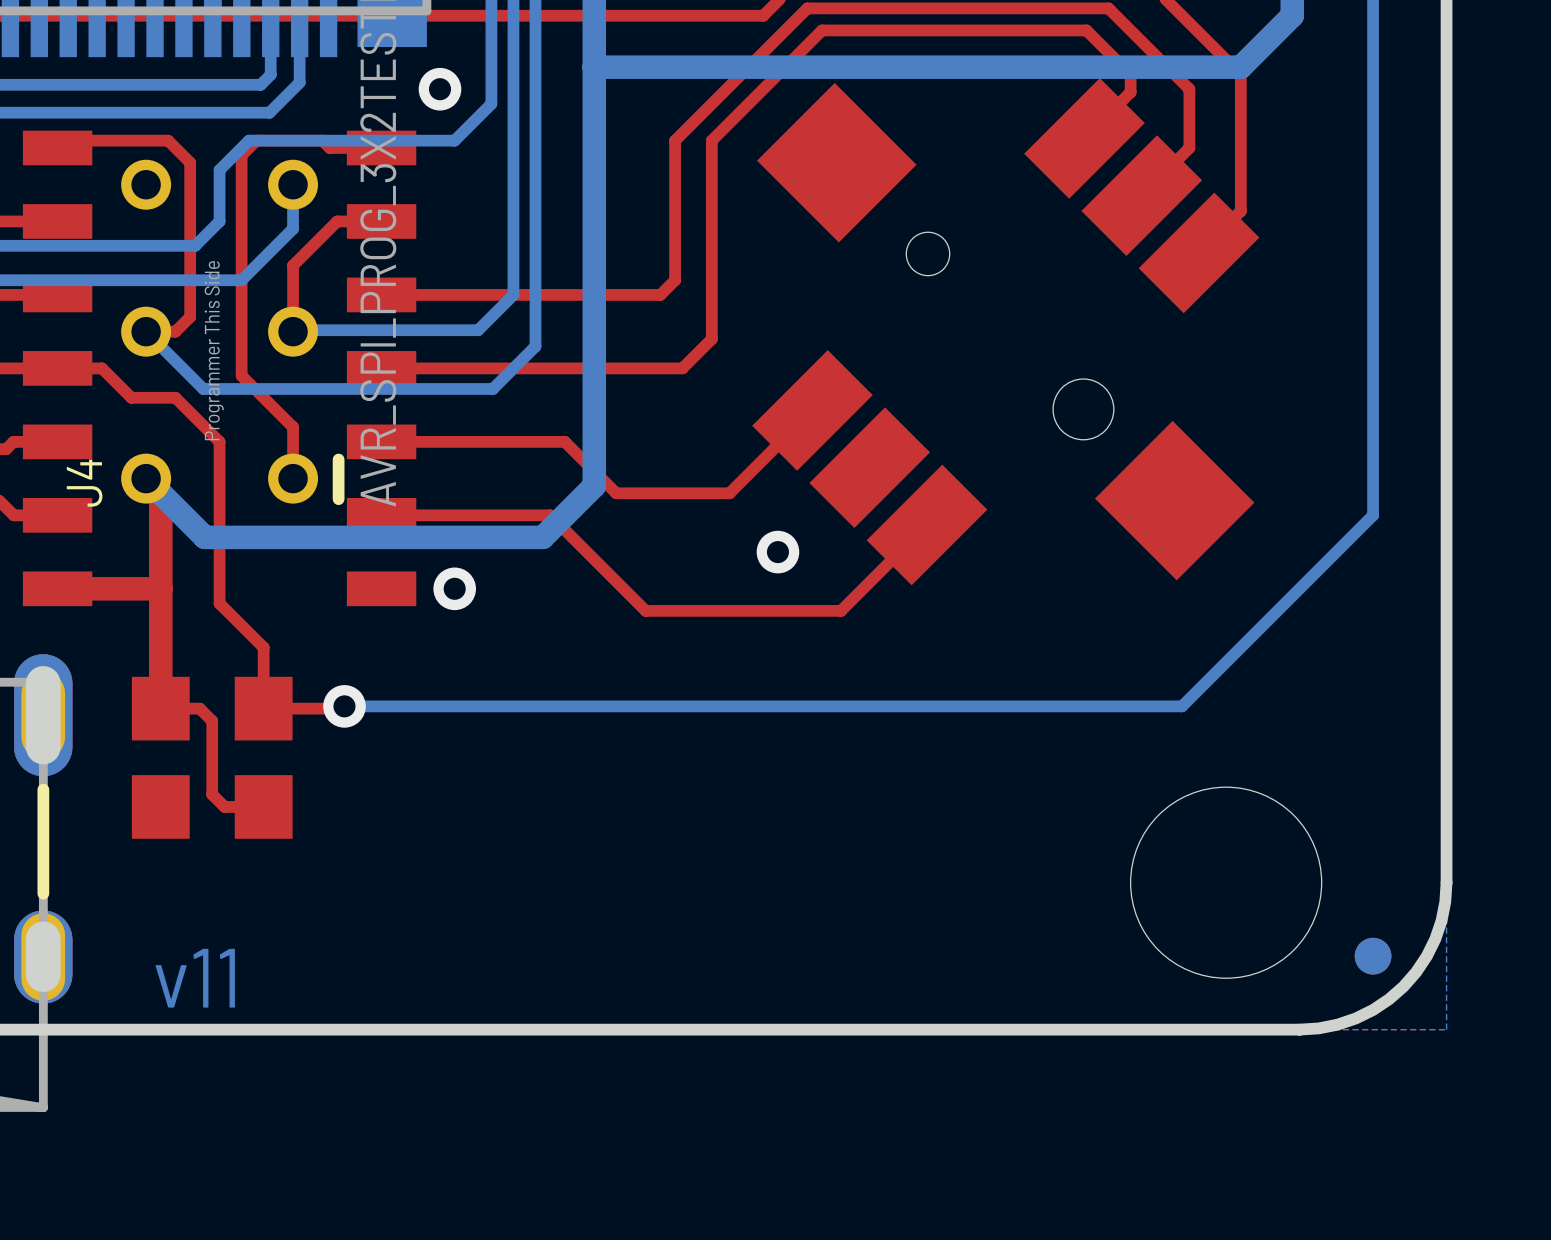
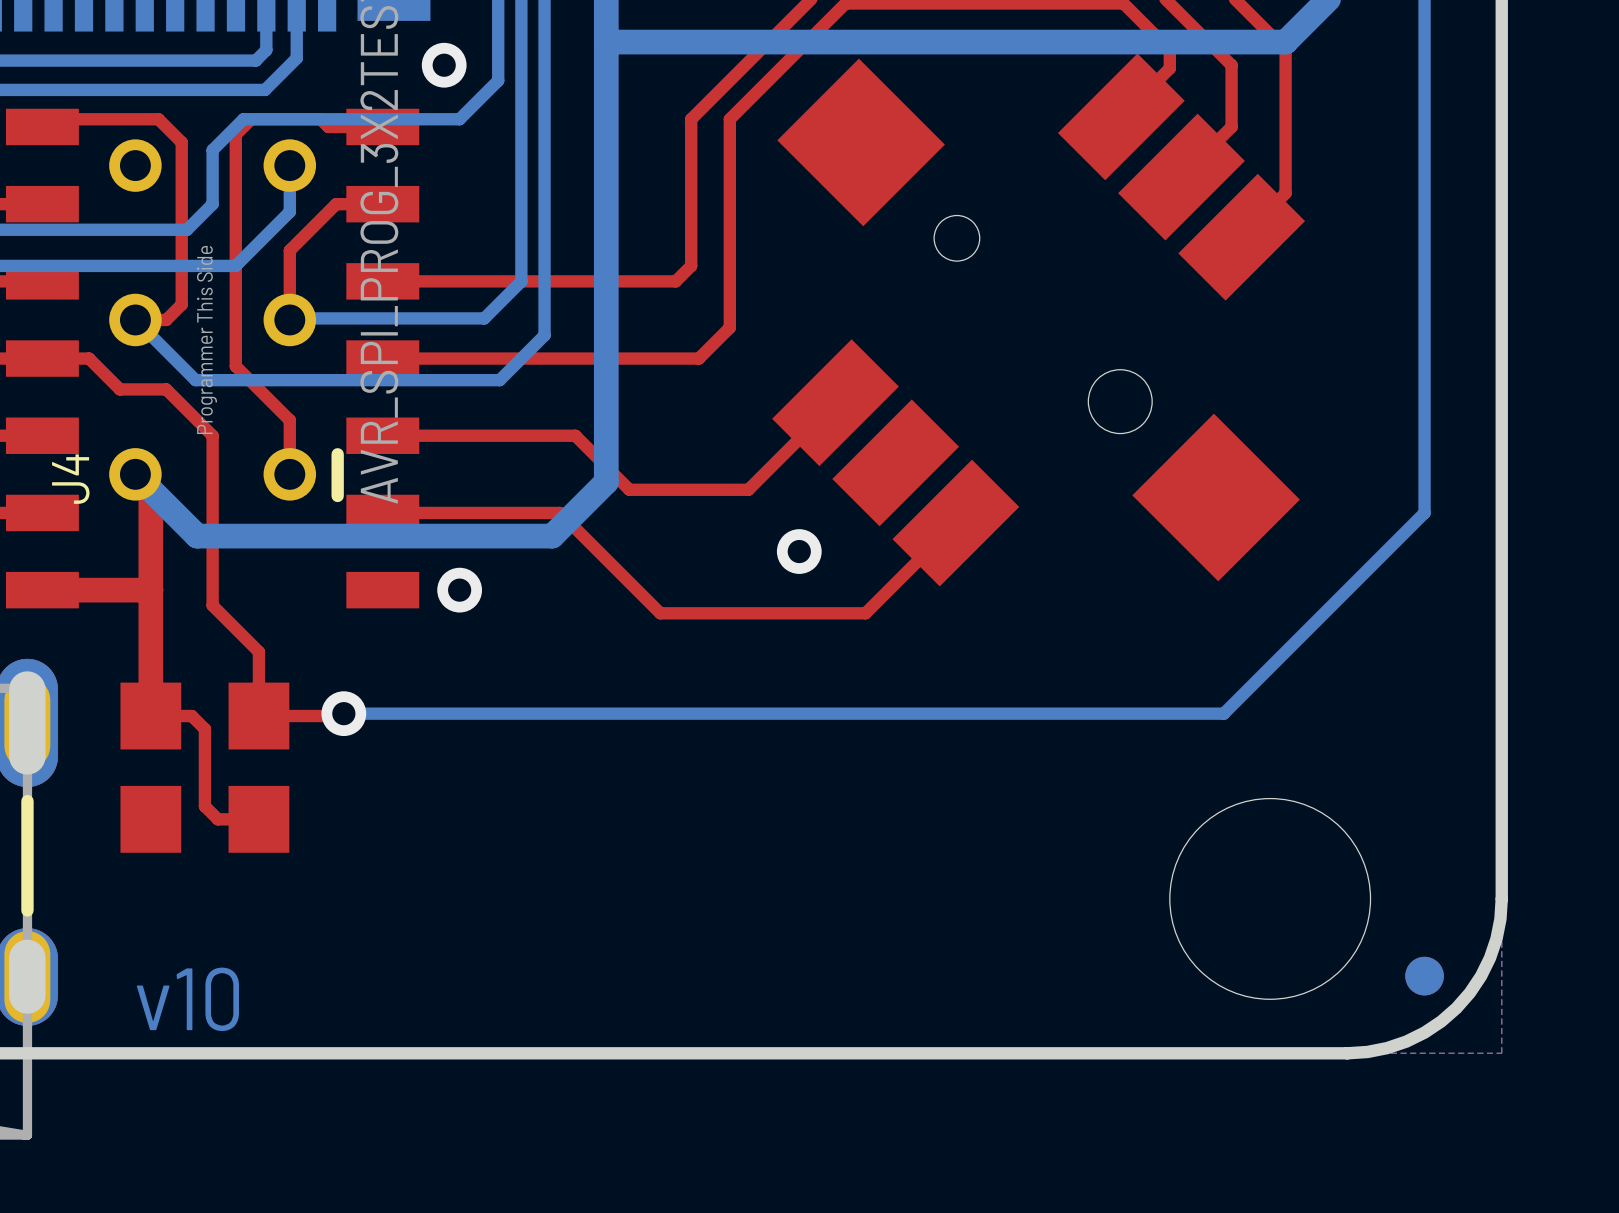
text: v11 (195, 978) -> v10 (187, 999)

